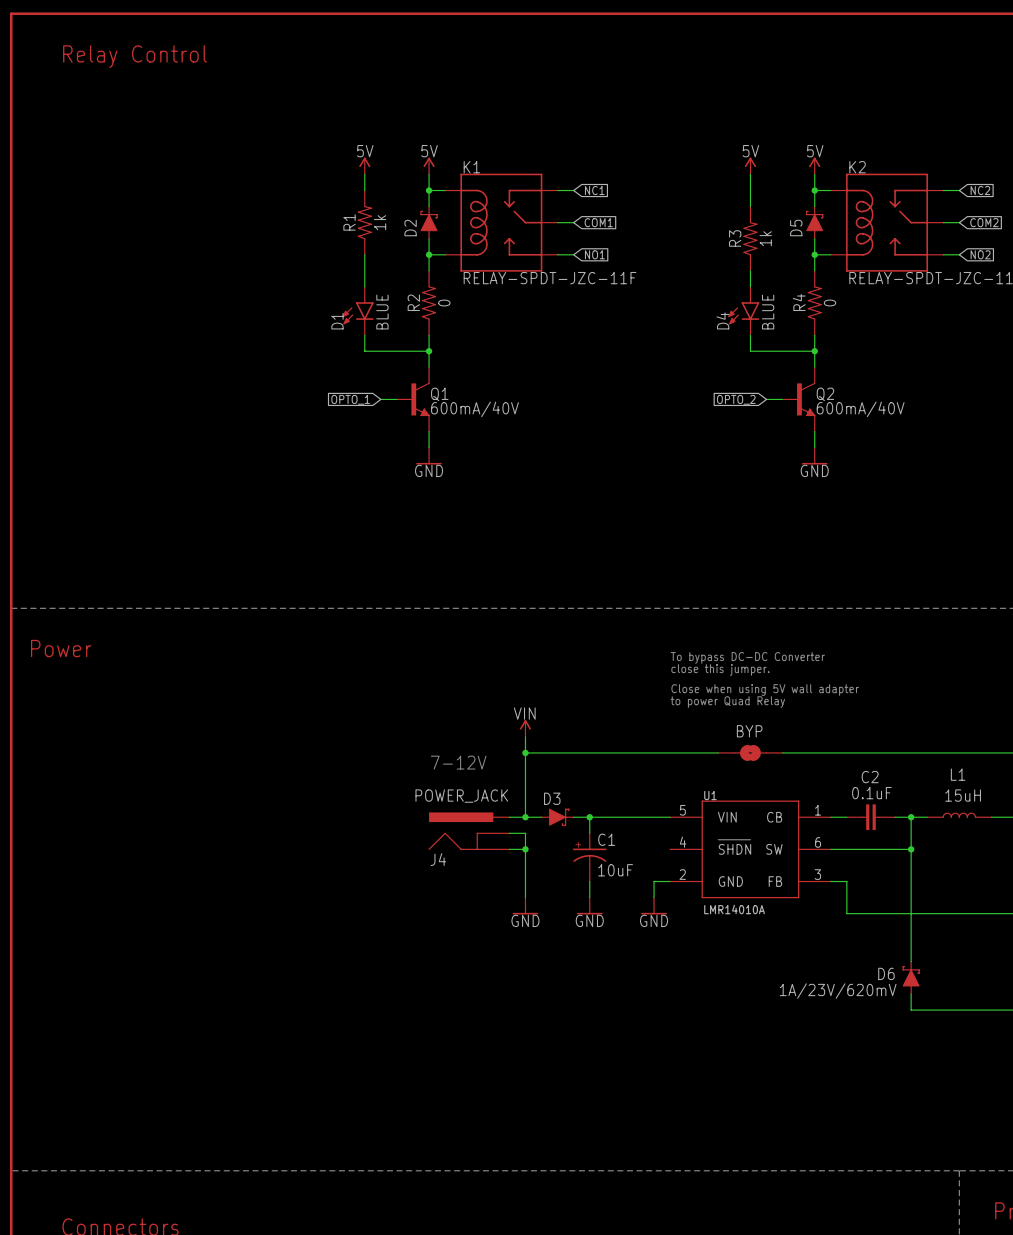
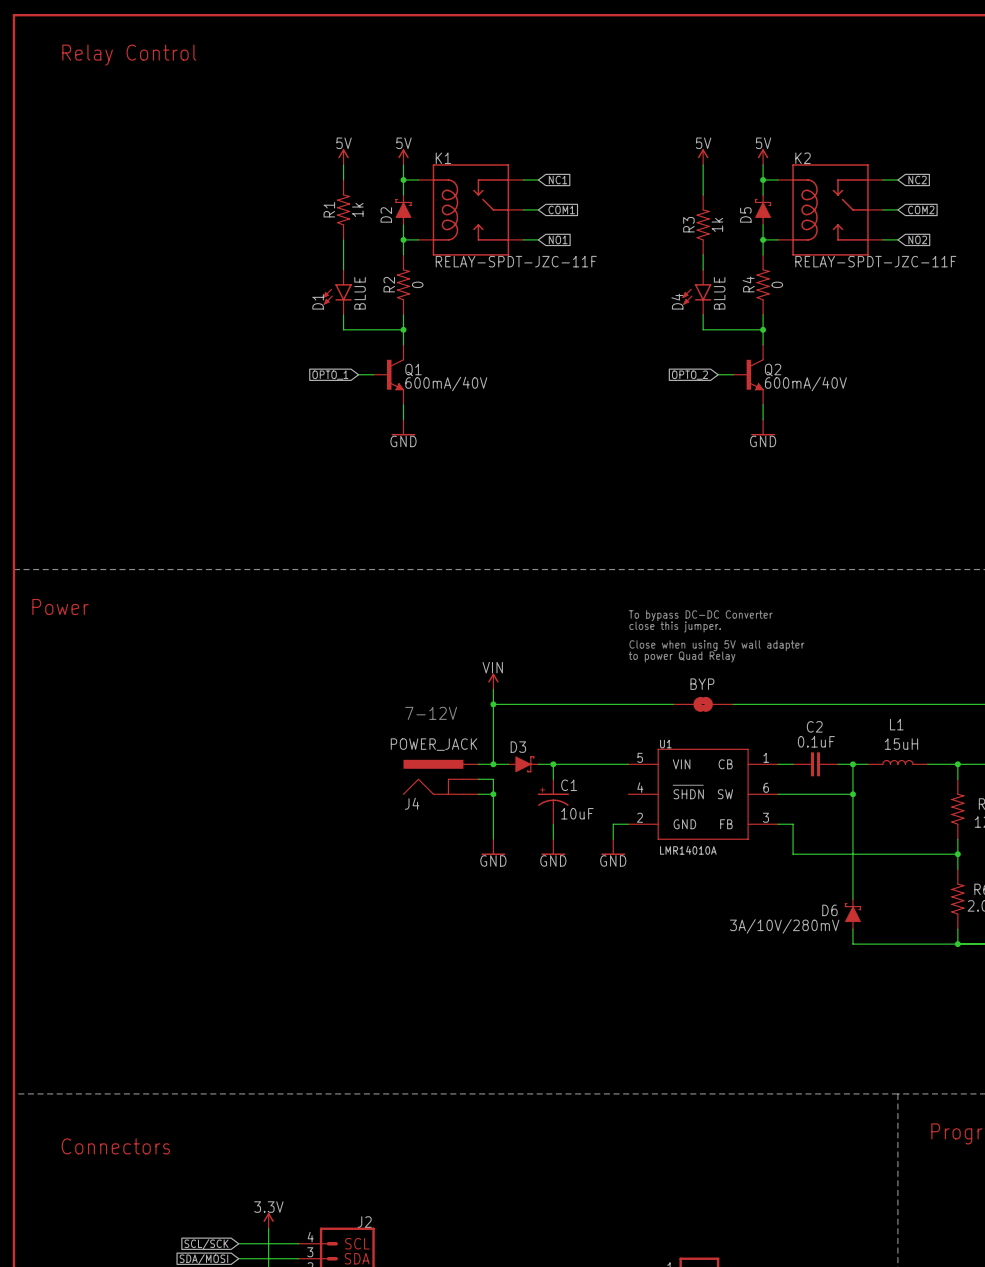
D6 value: 1A/23V/620mV (838, 991) -> 3A/10V/280mV (784, 926)

